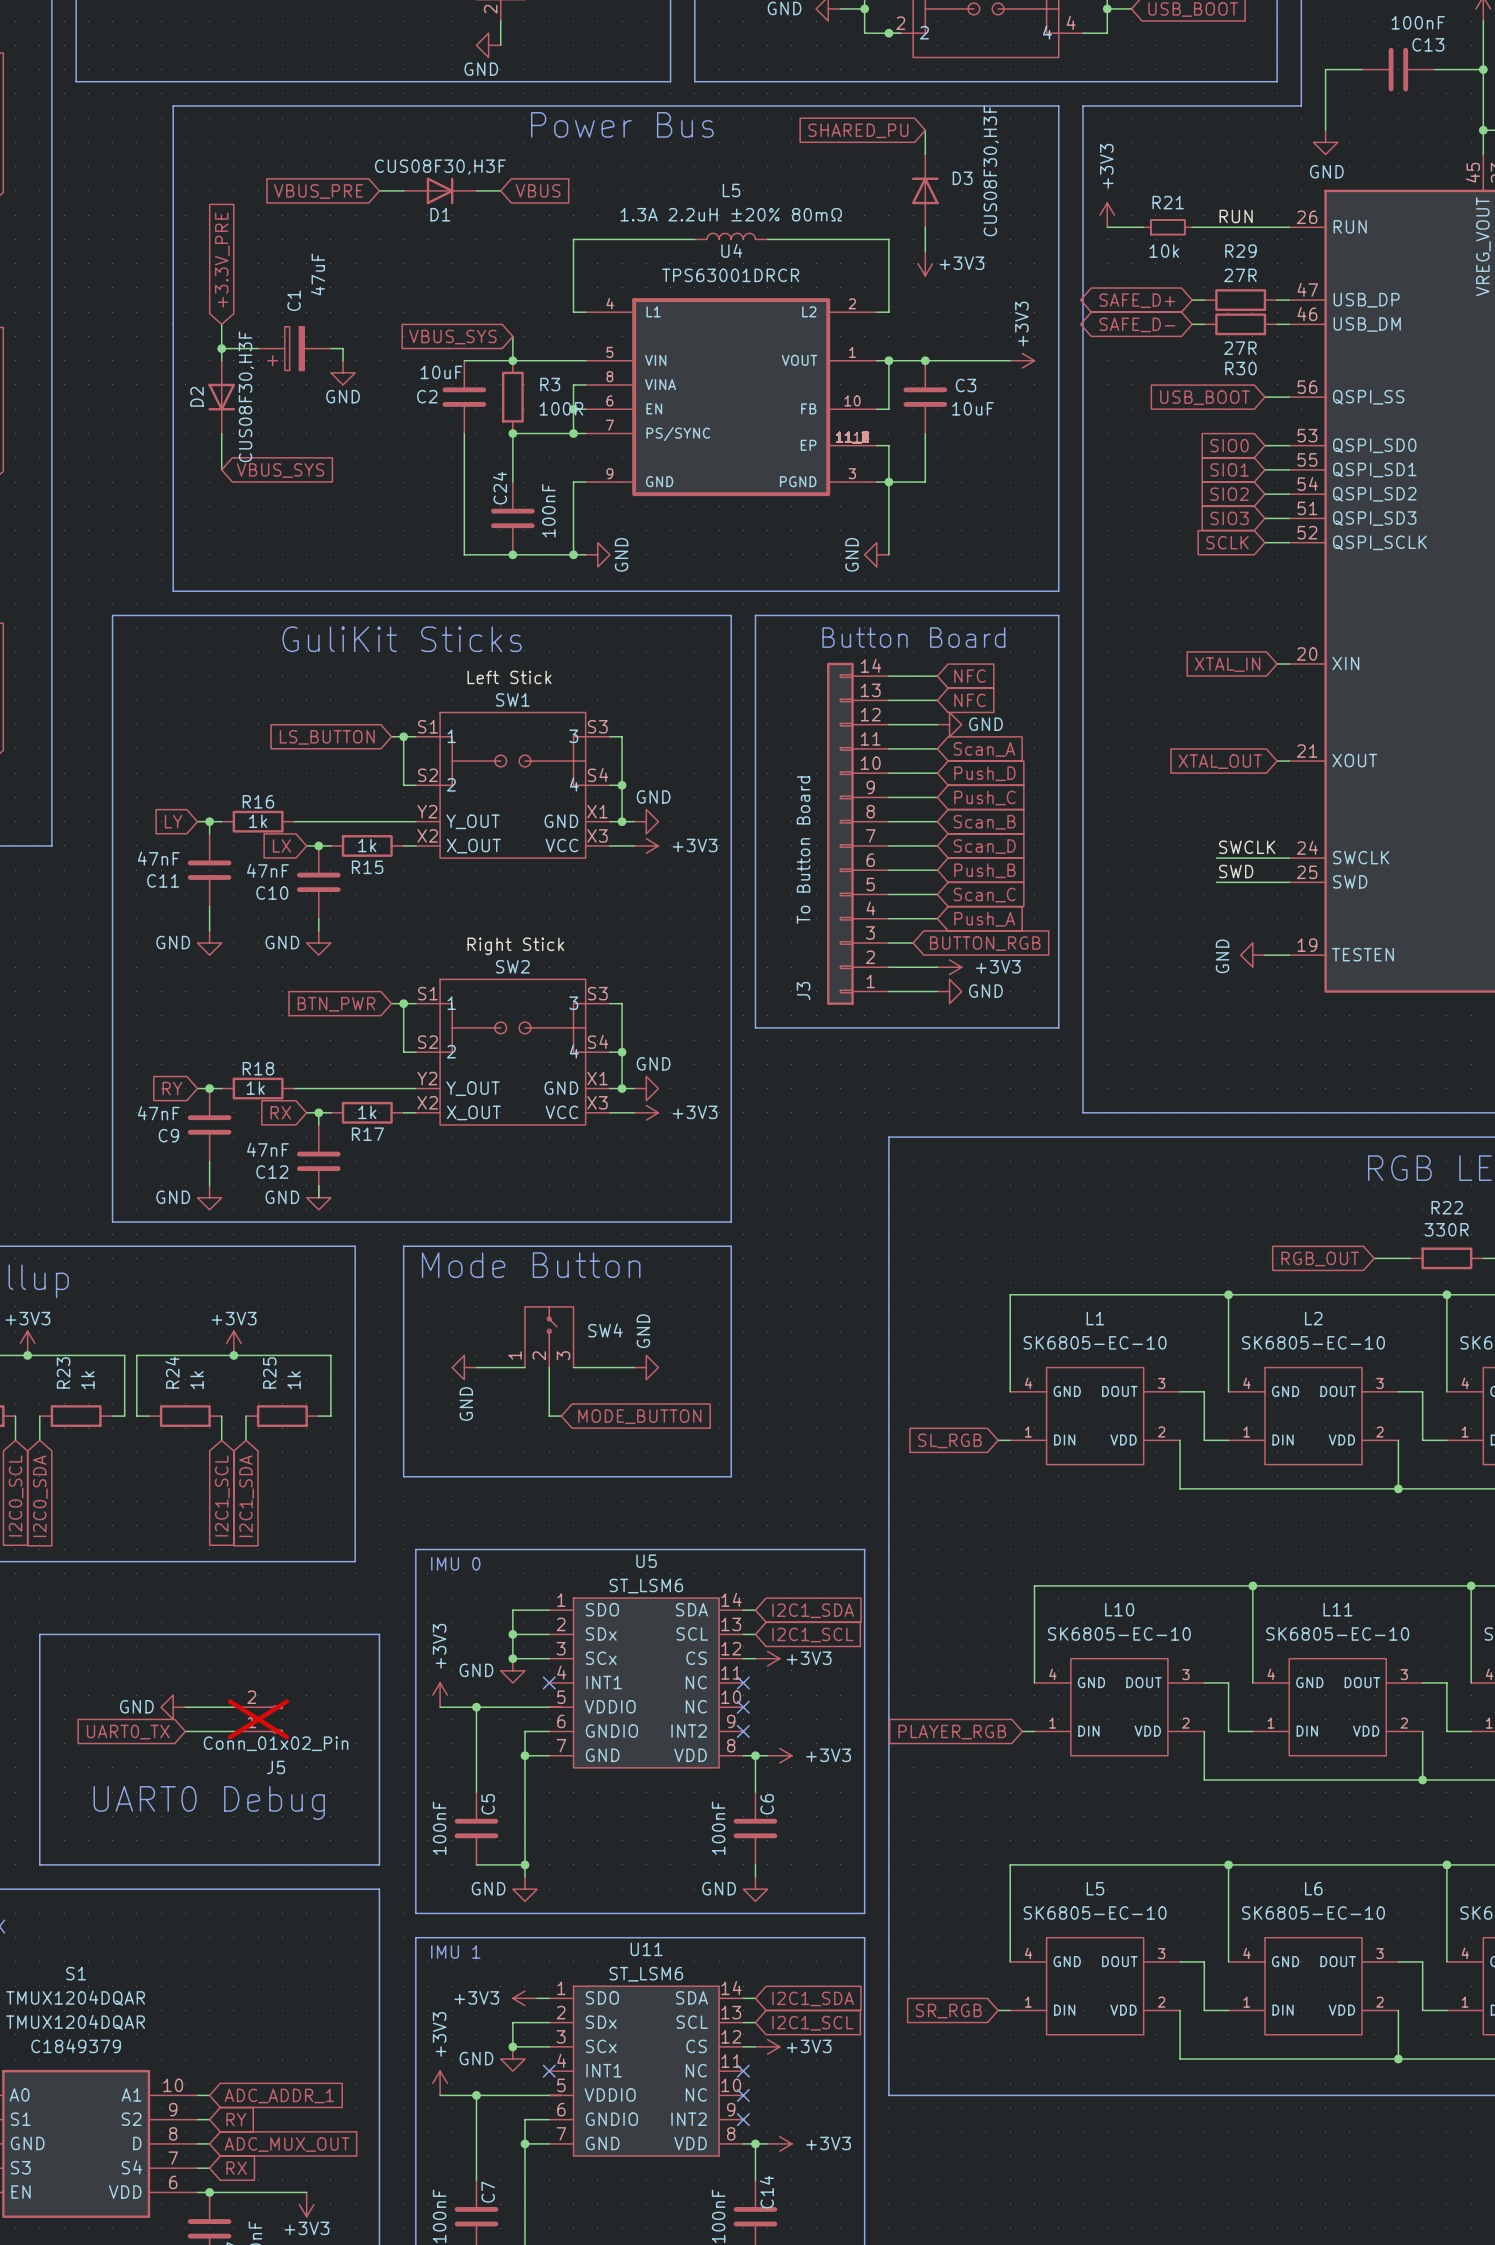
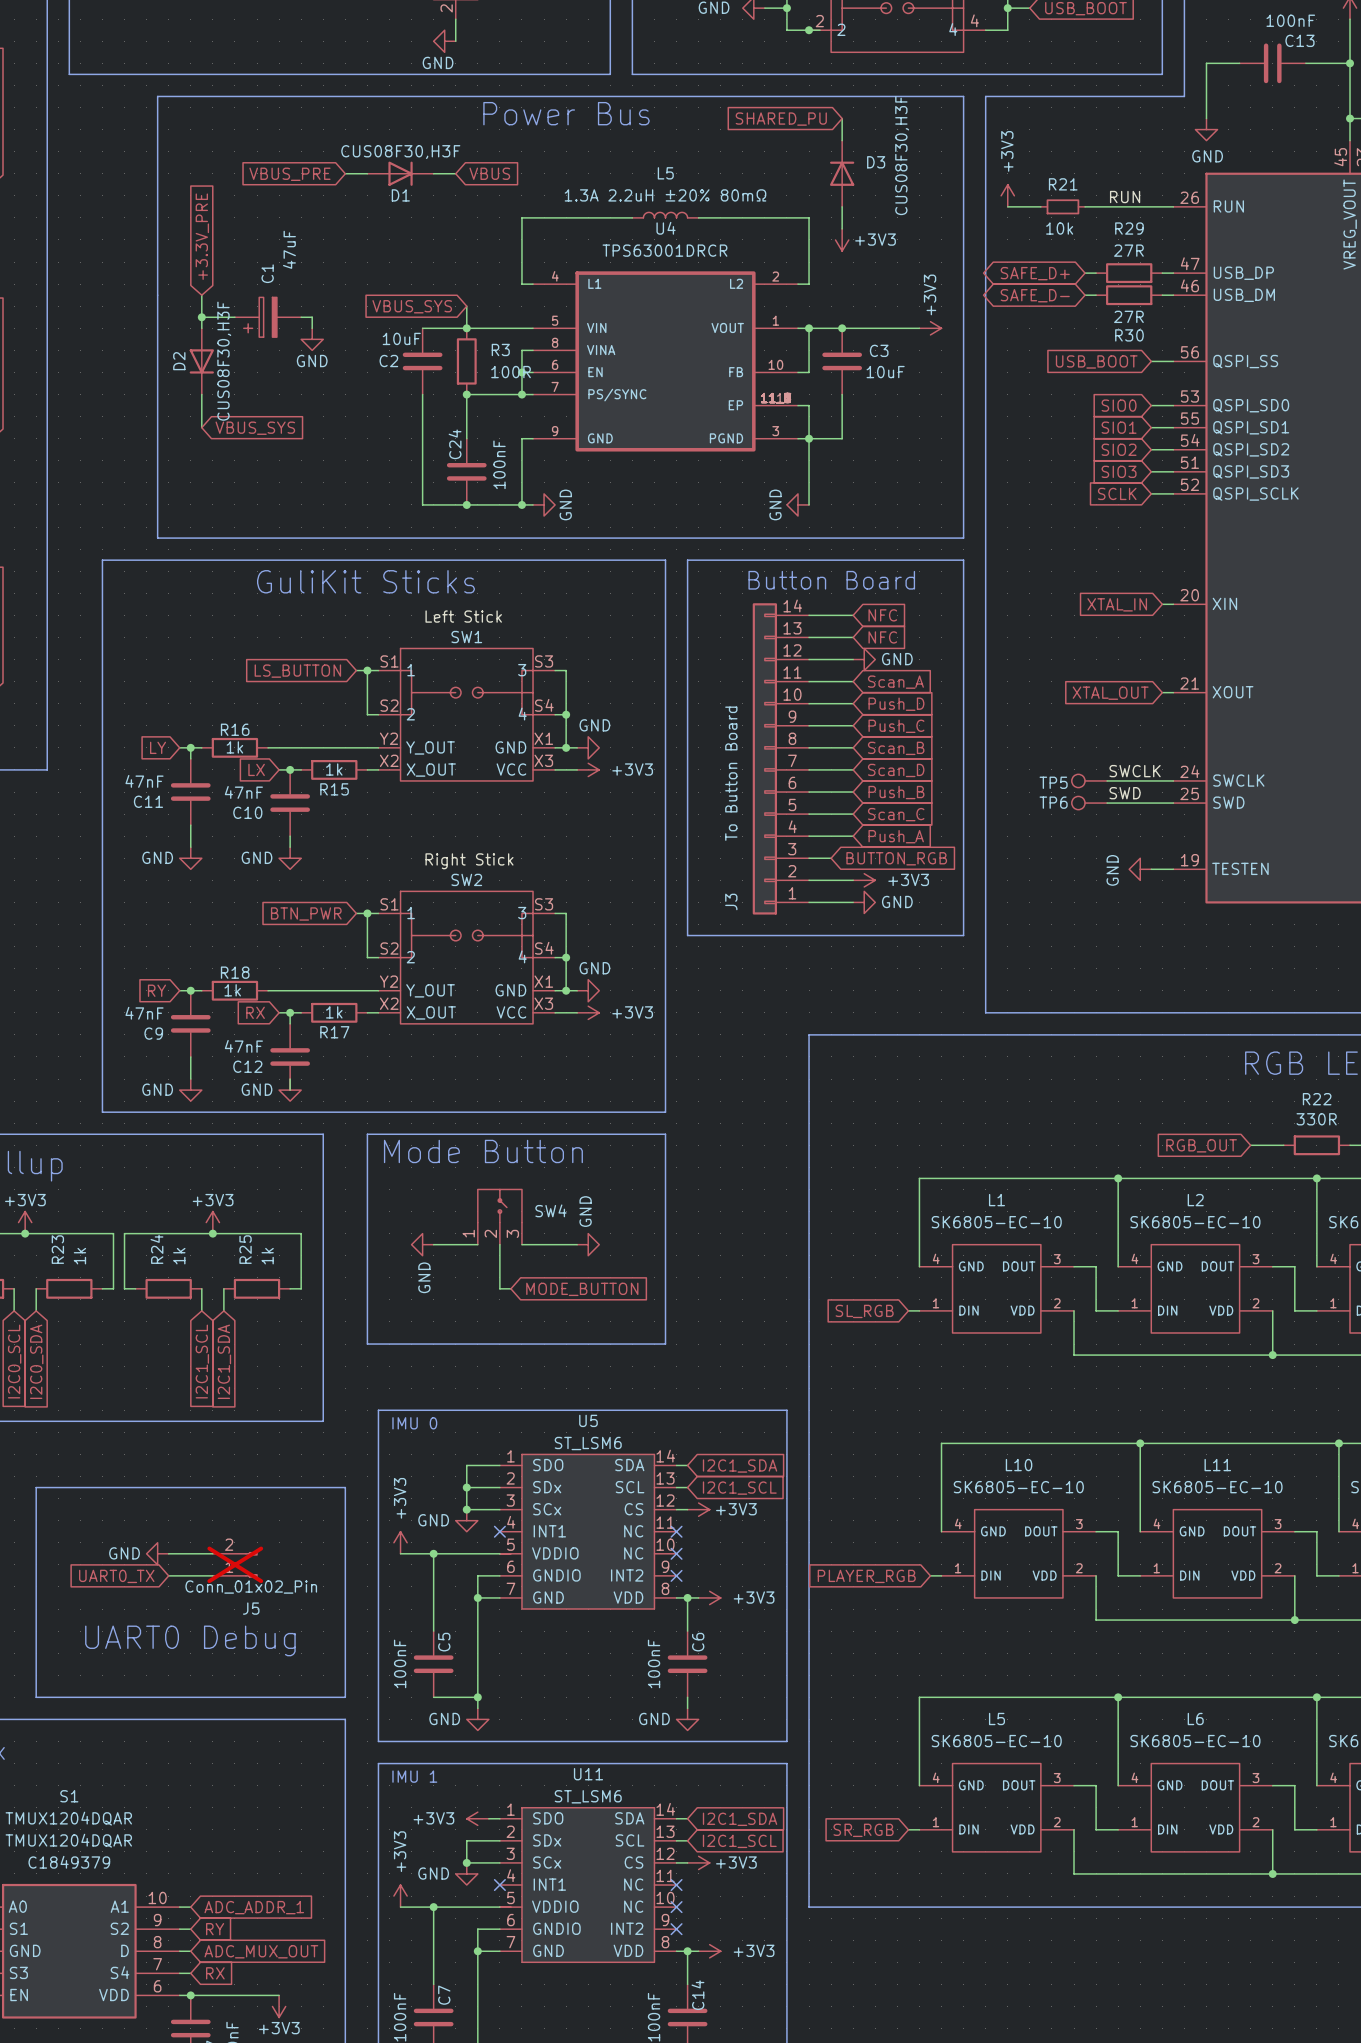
TP5: none -> (1089, 780)
TP6: none -> (1089, 803)

